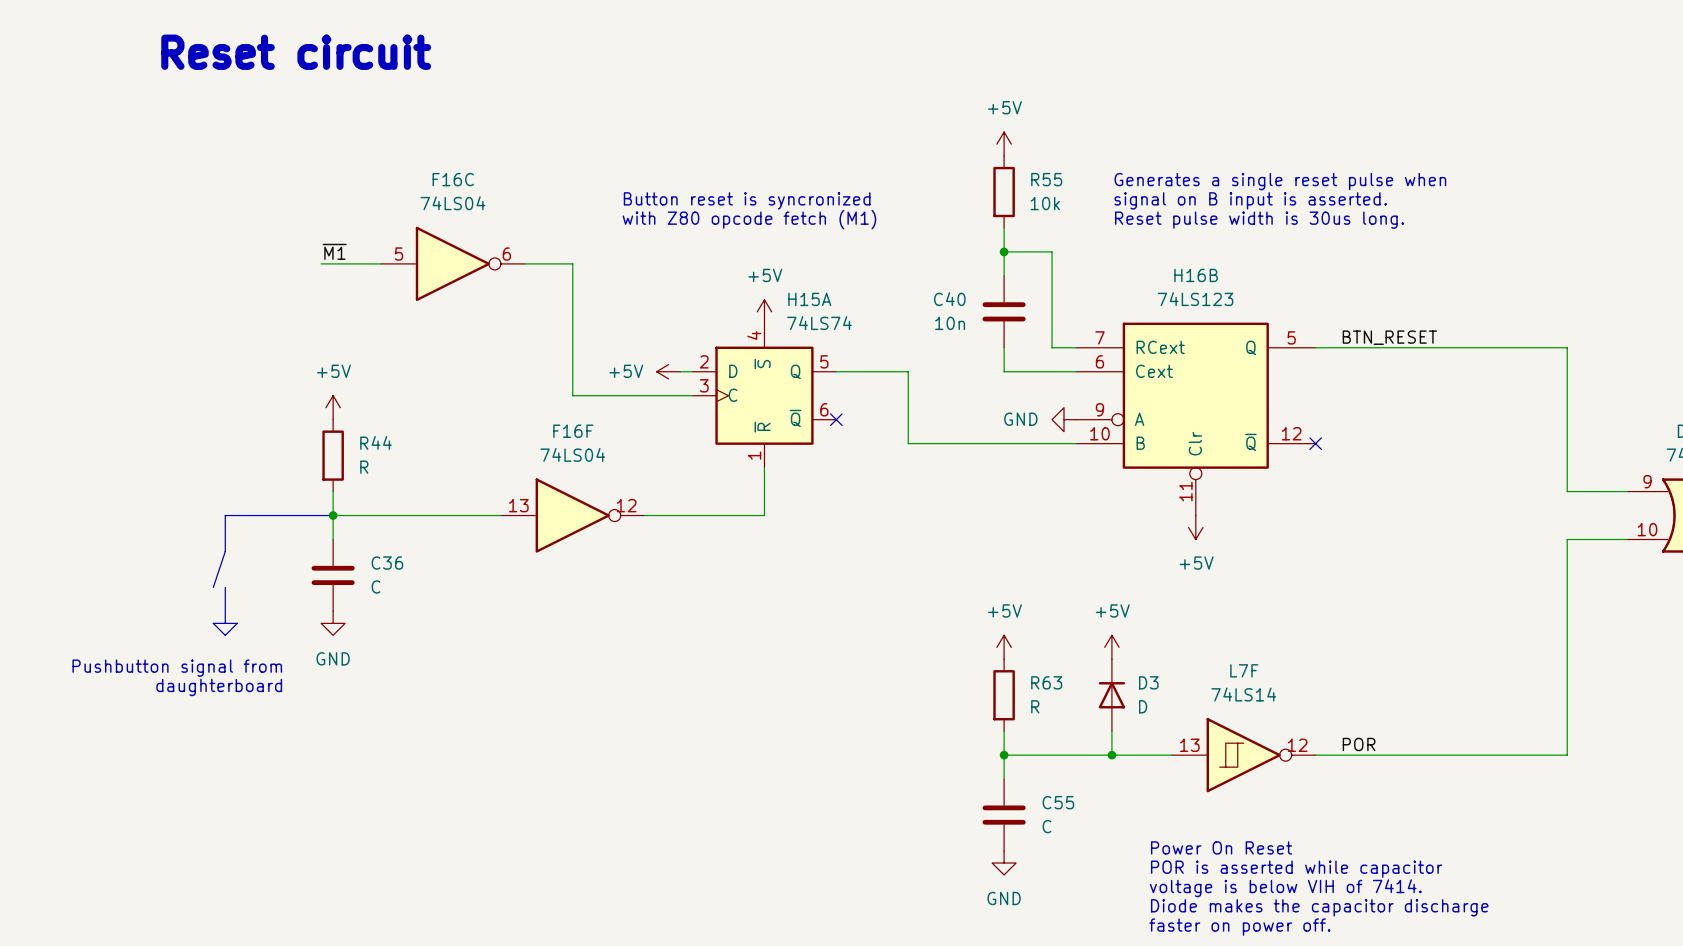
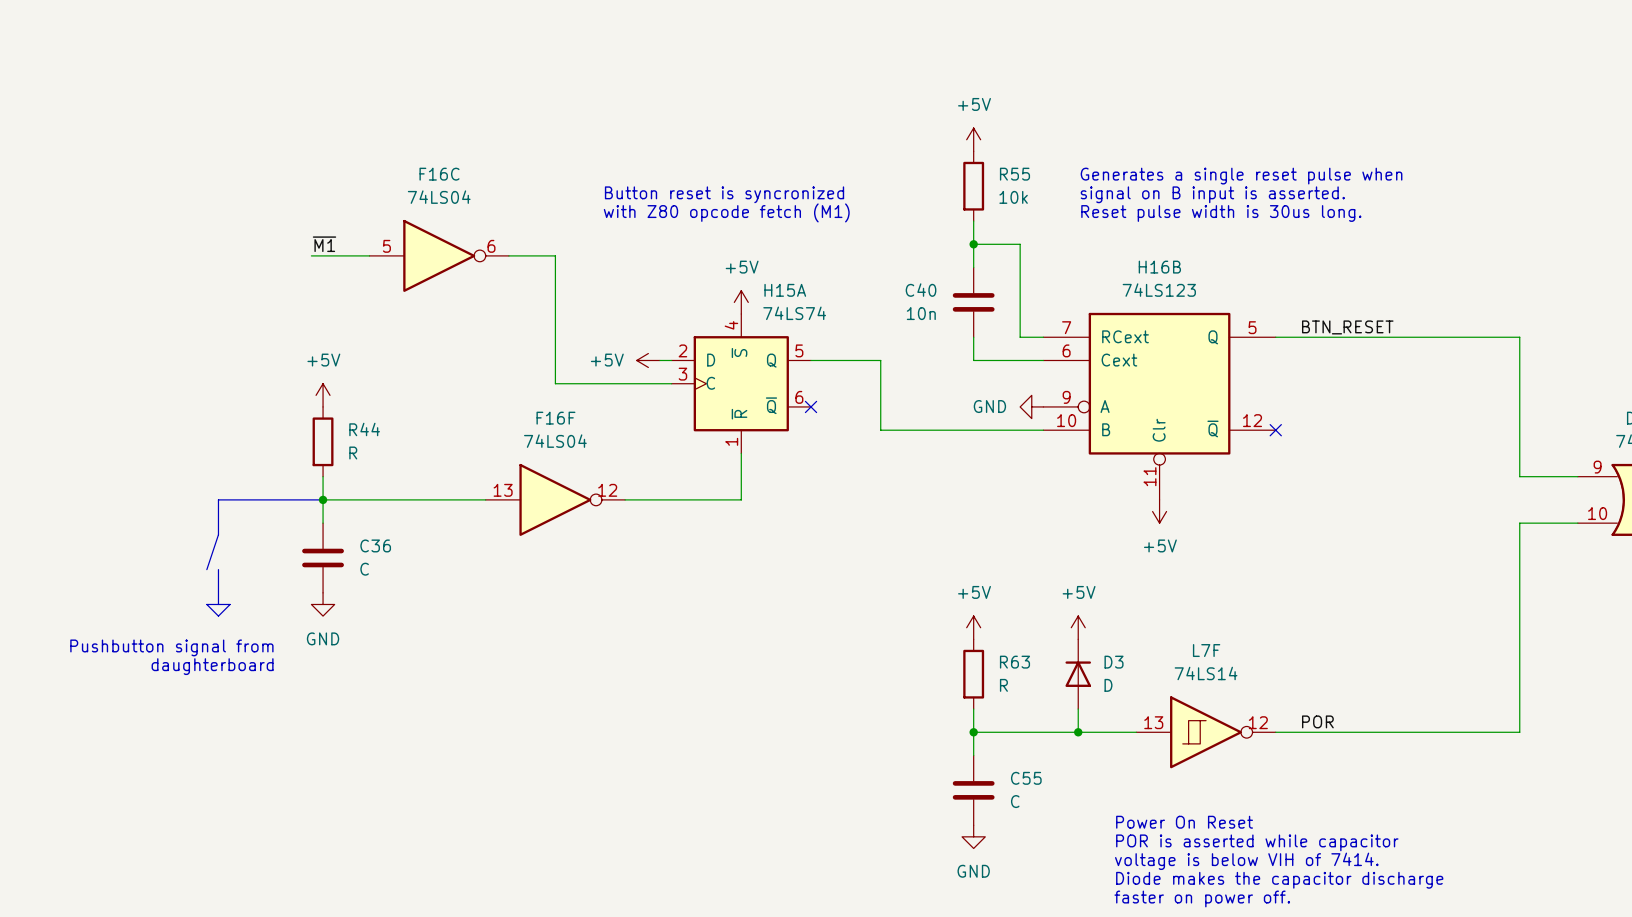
text: Reset circuit (296, 52) -> none

